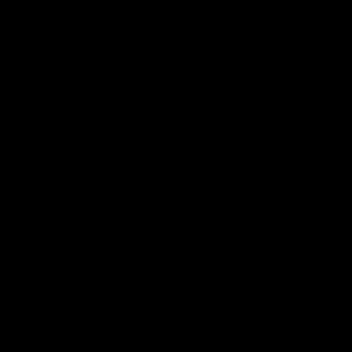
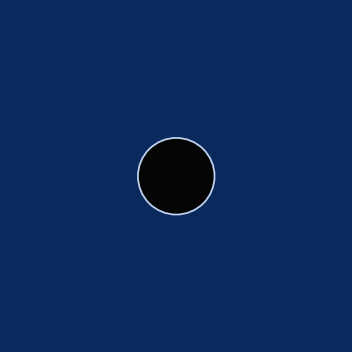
part: none -> (176, 176)

